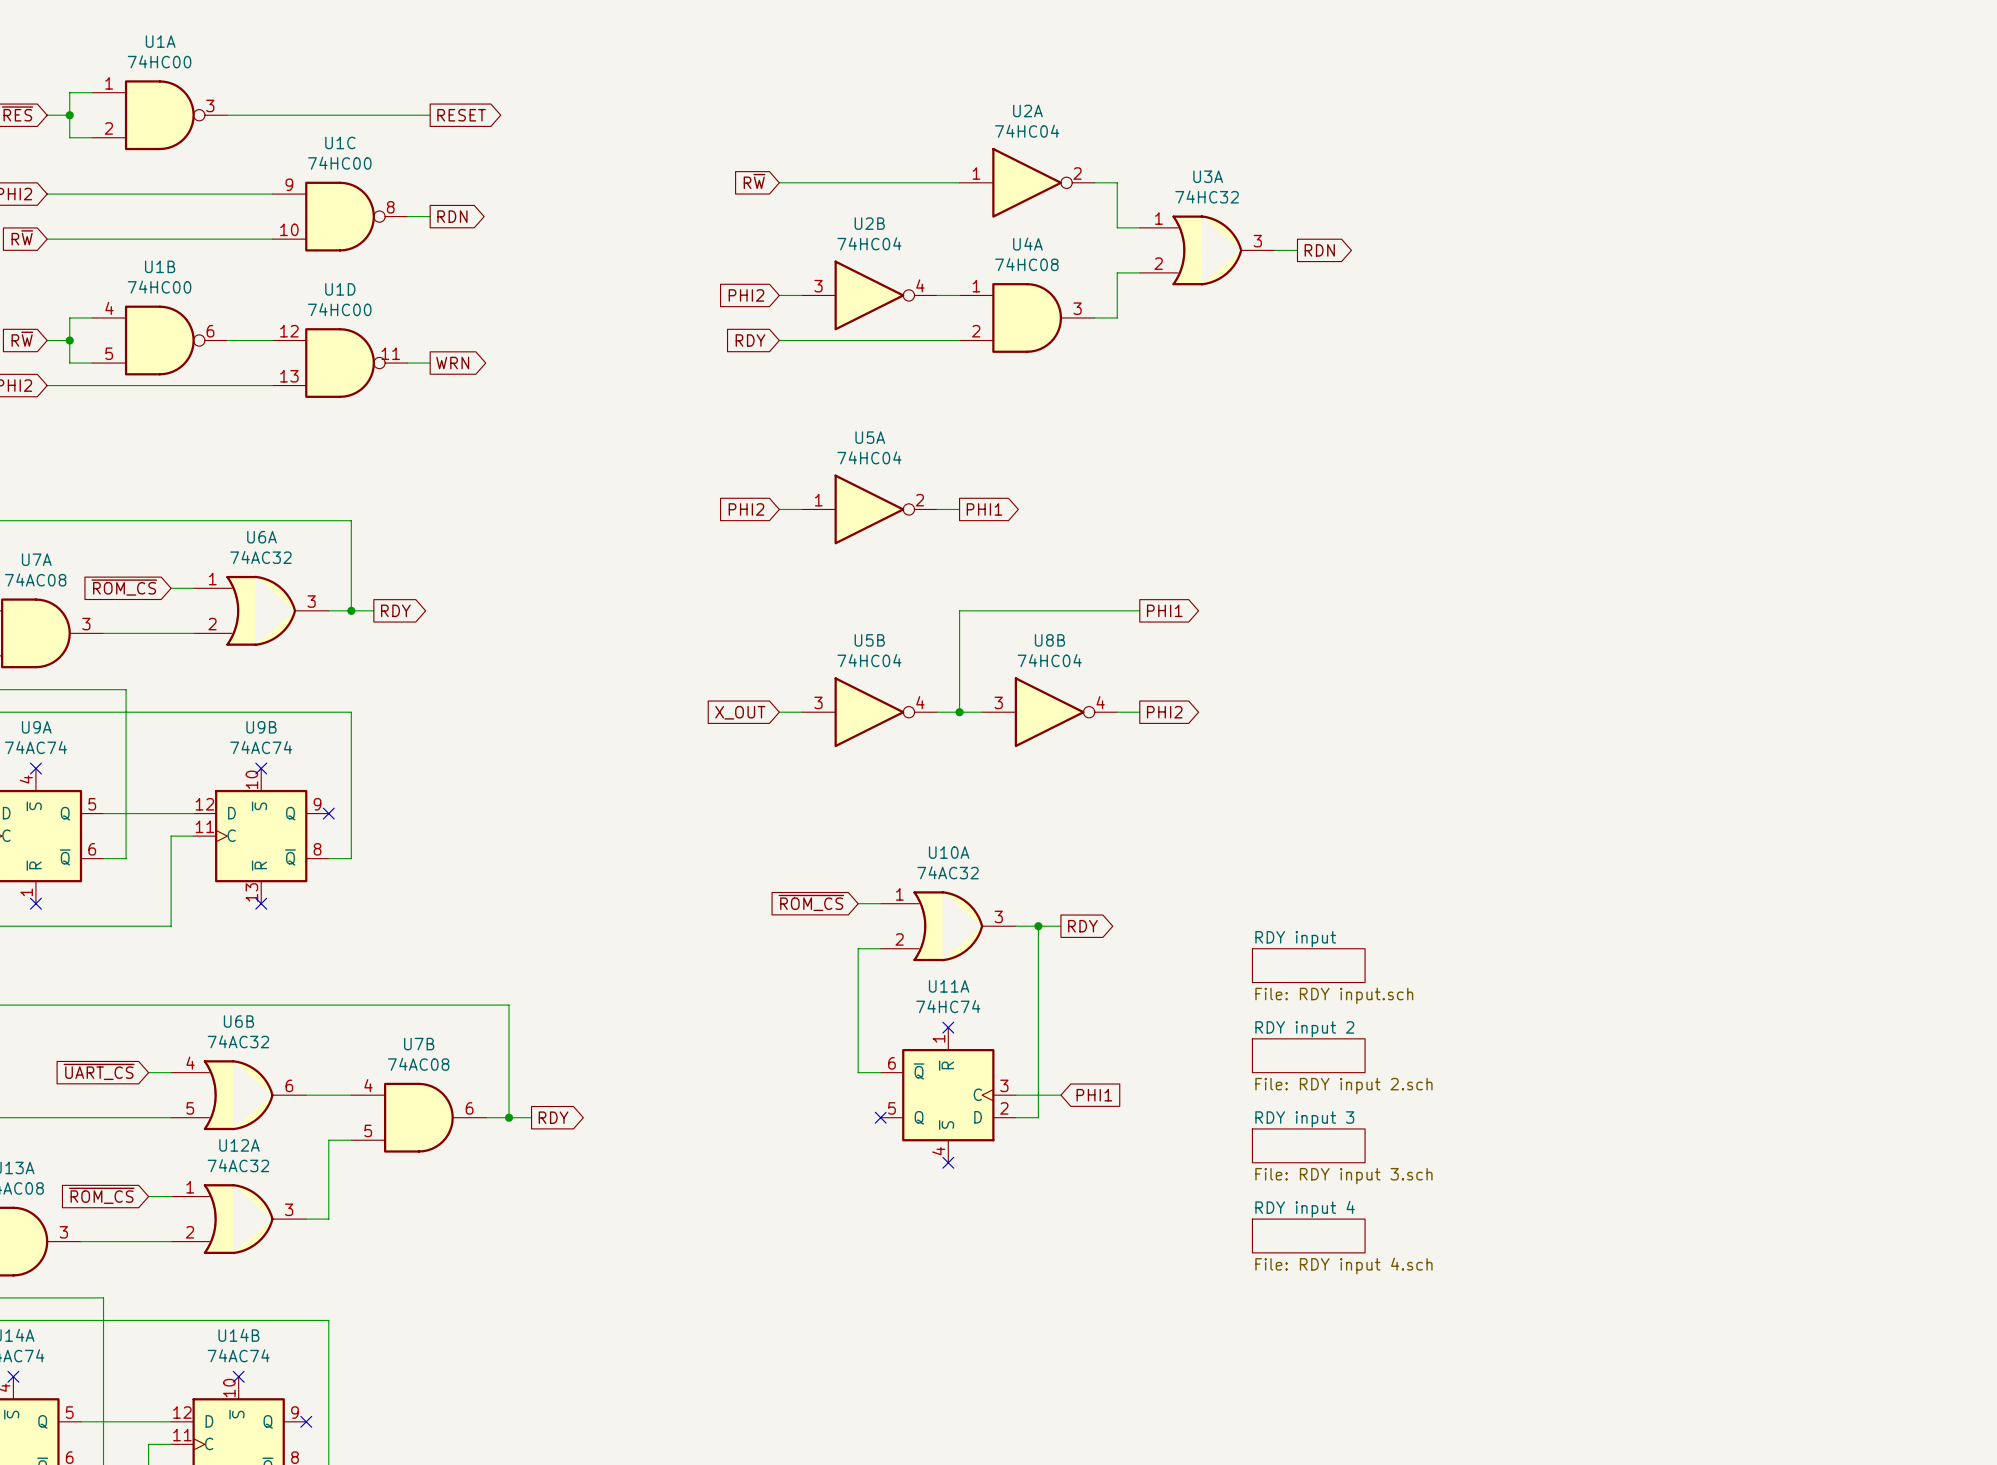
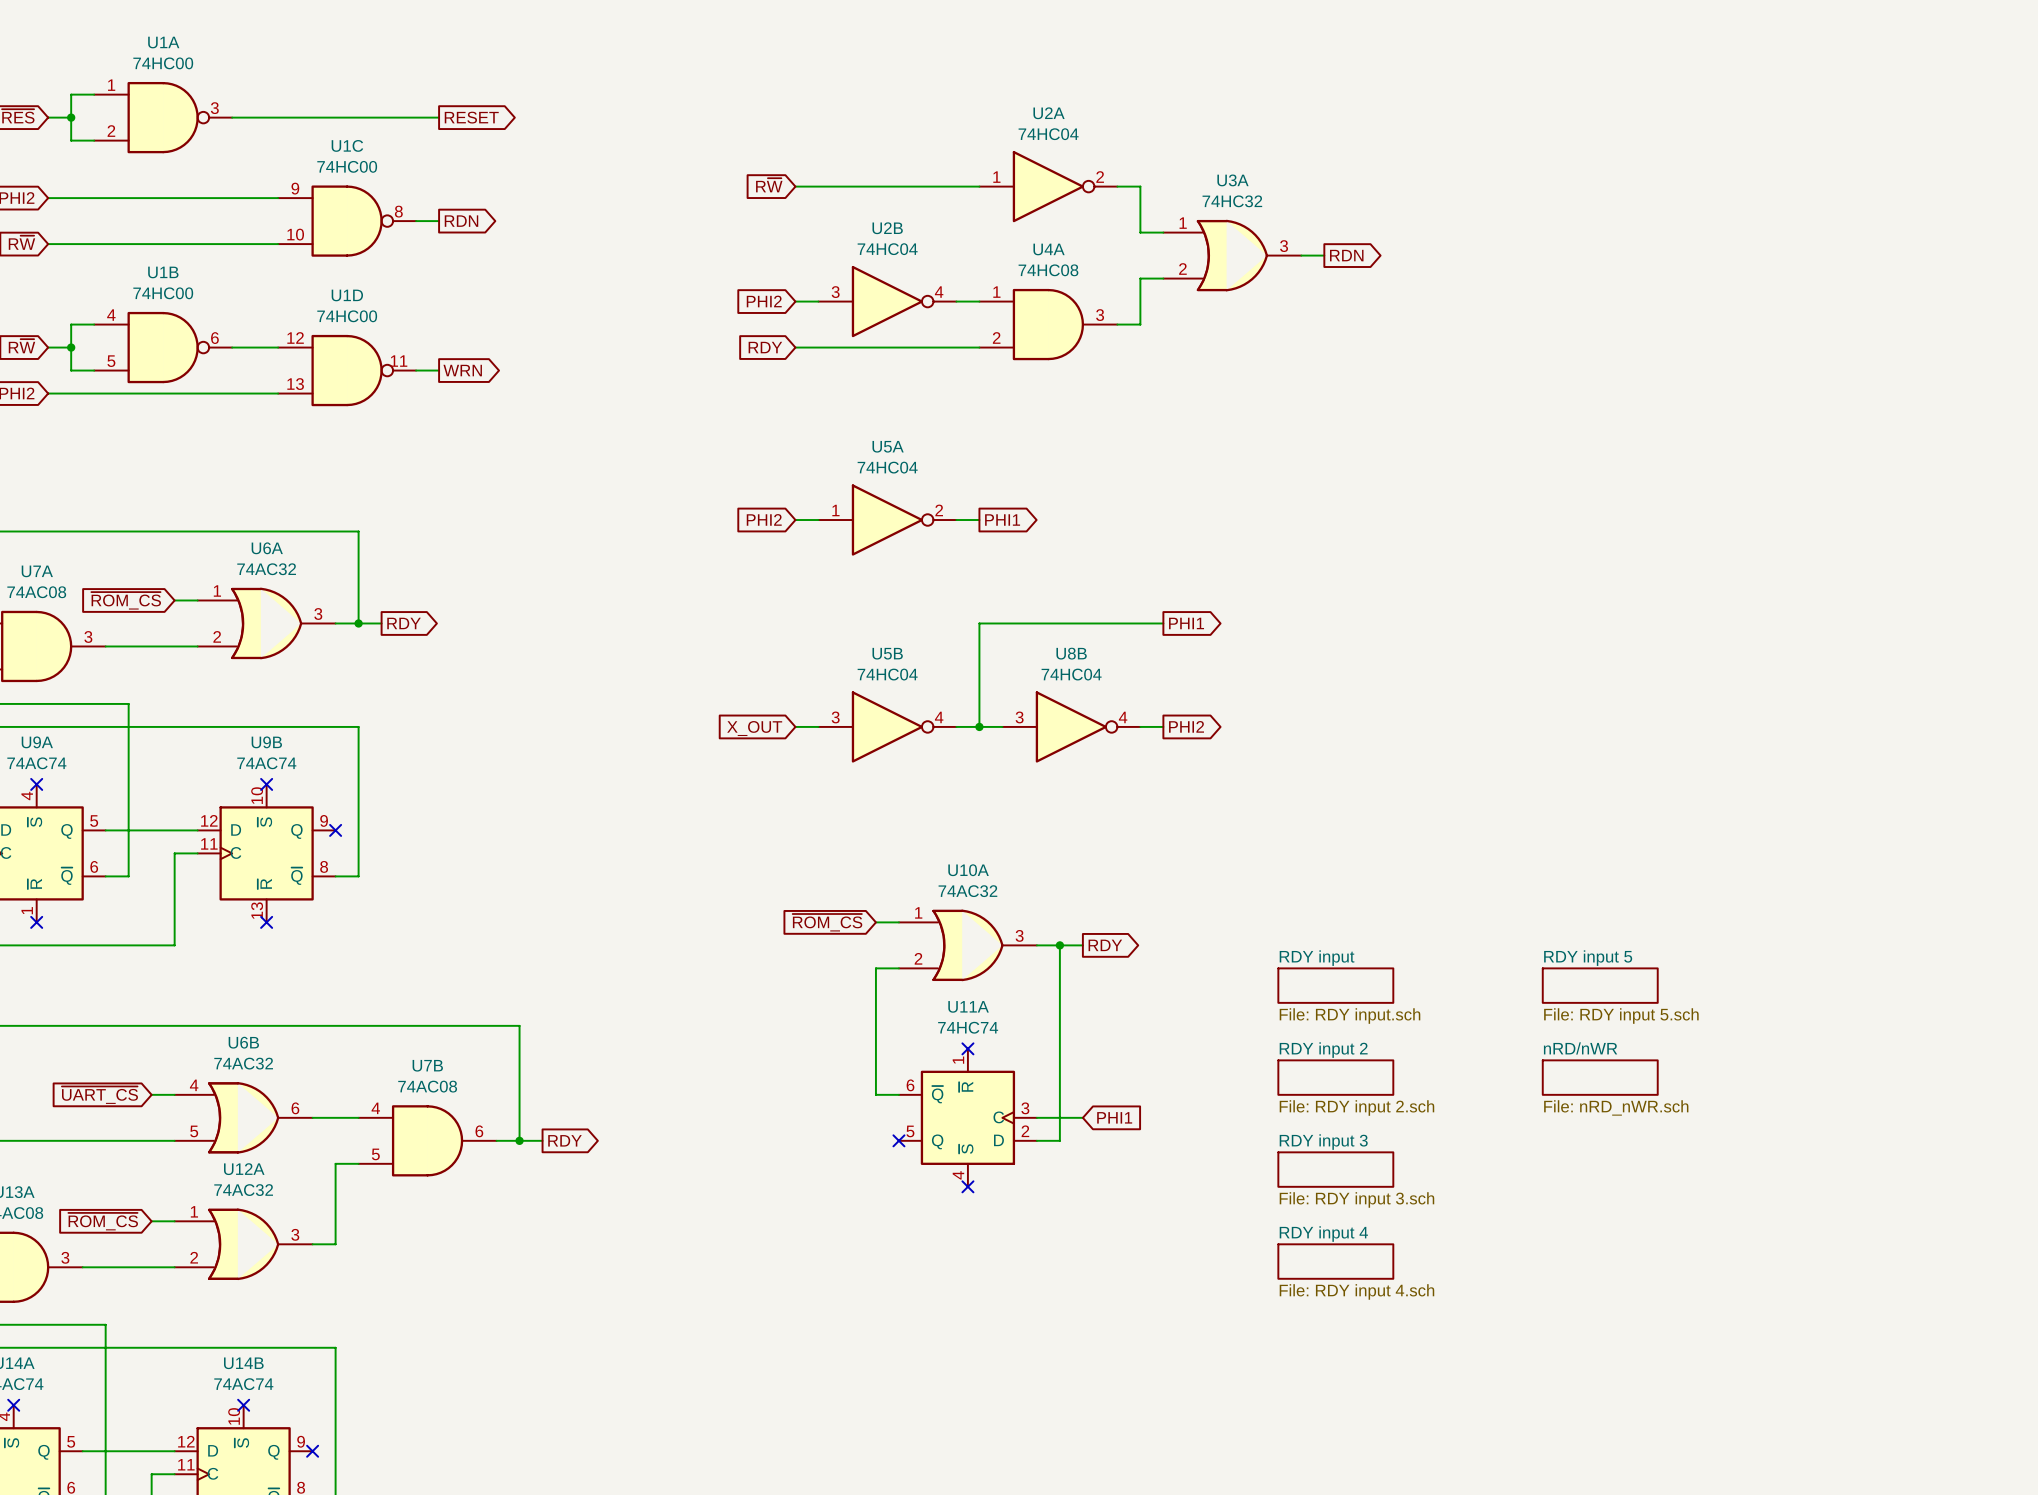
sheet RDY input 5: none -> File: RDY input 5.sch (1600, 985)
sheet nRD/nWR: none -> File: nRD_nWR.sch (1600, 1077)

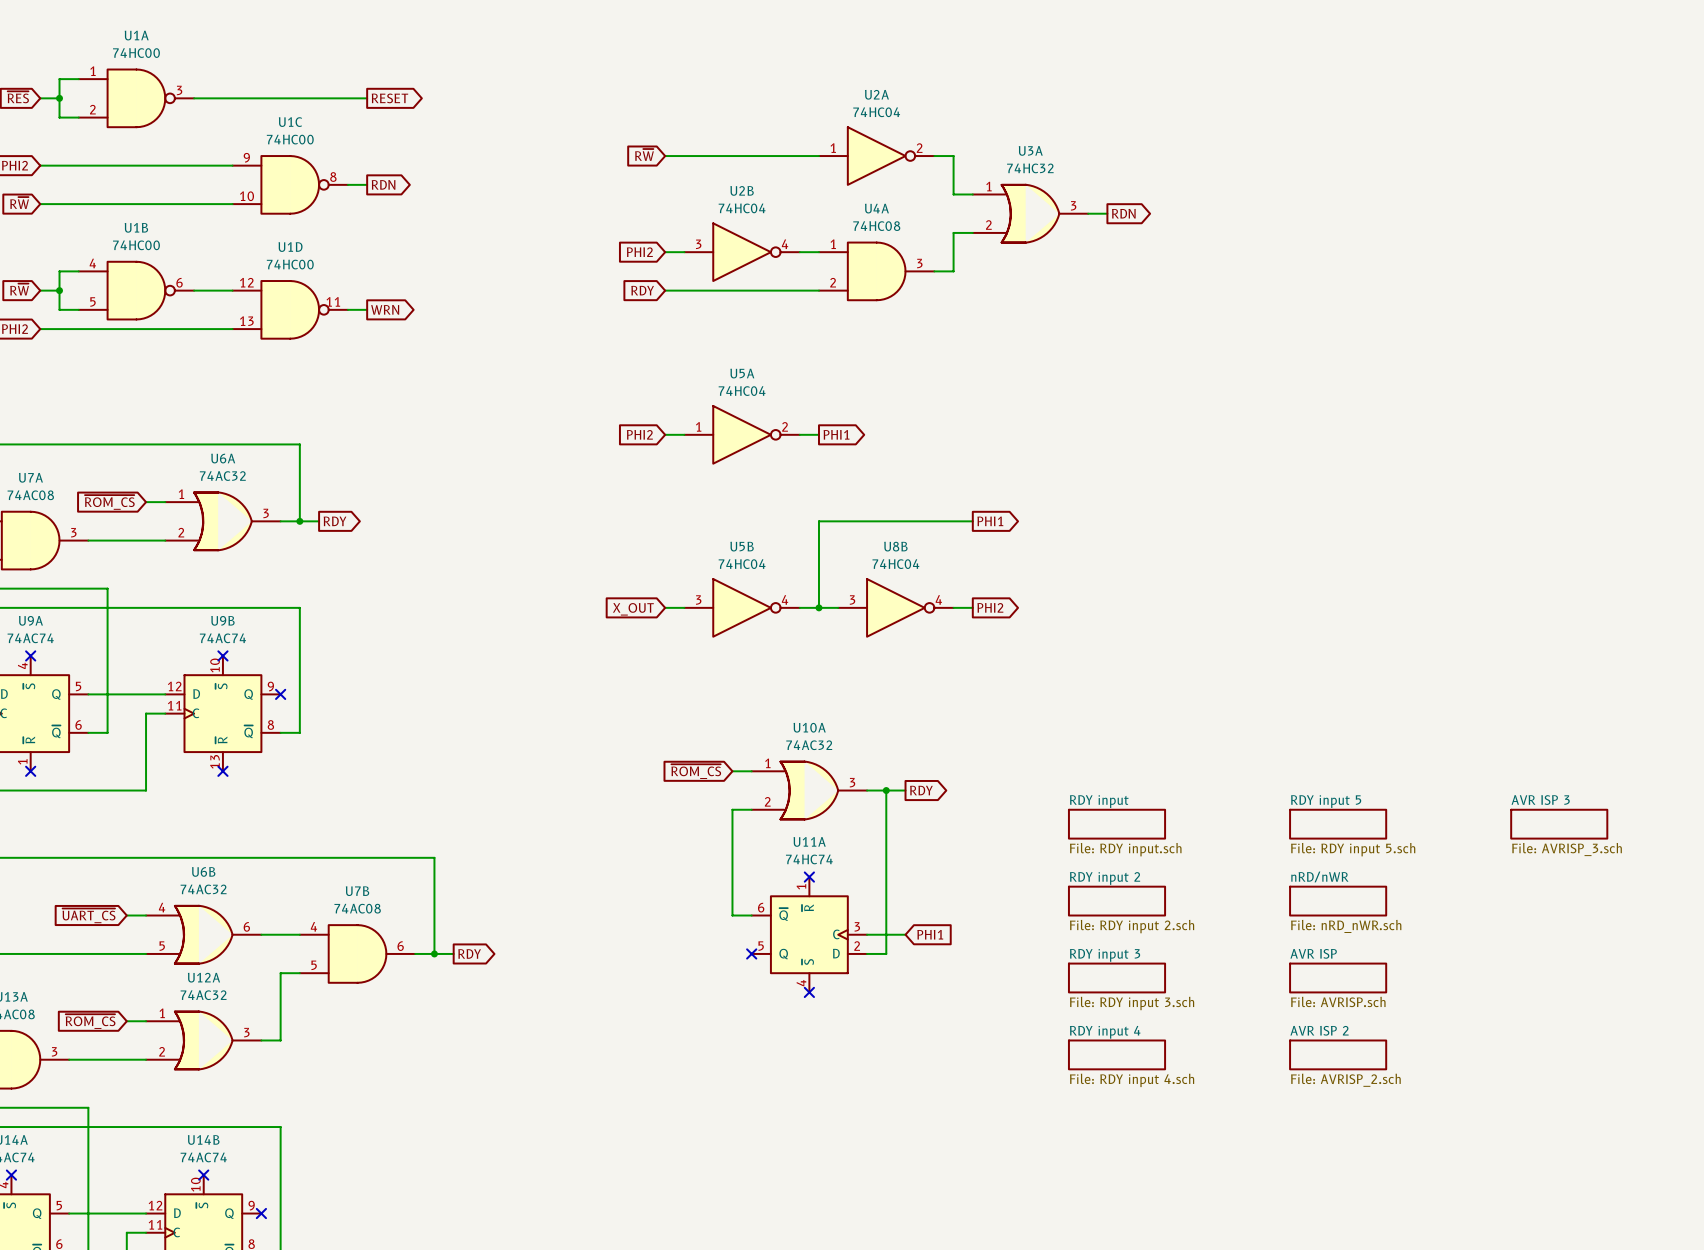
sheet AVR ISP 3: none -> File: AVRISP_3.sch (1559, 824)
sheet AVR ISP: none -> File: AVRISP.sch (1338, 977)
sheet AVR ISP 2: none -> File: AVRISP_2.sch (1338, 1054)

